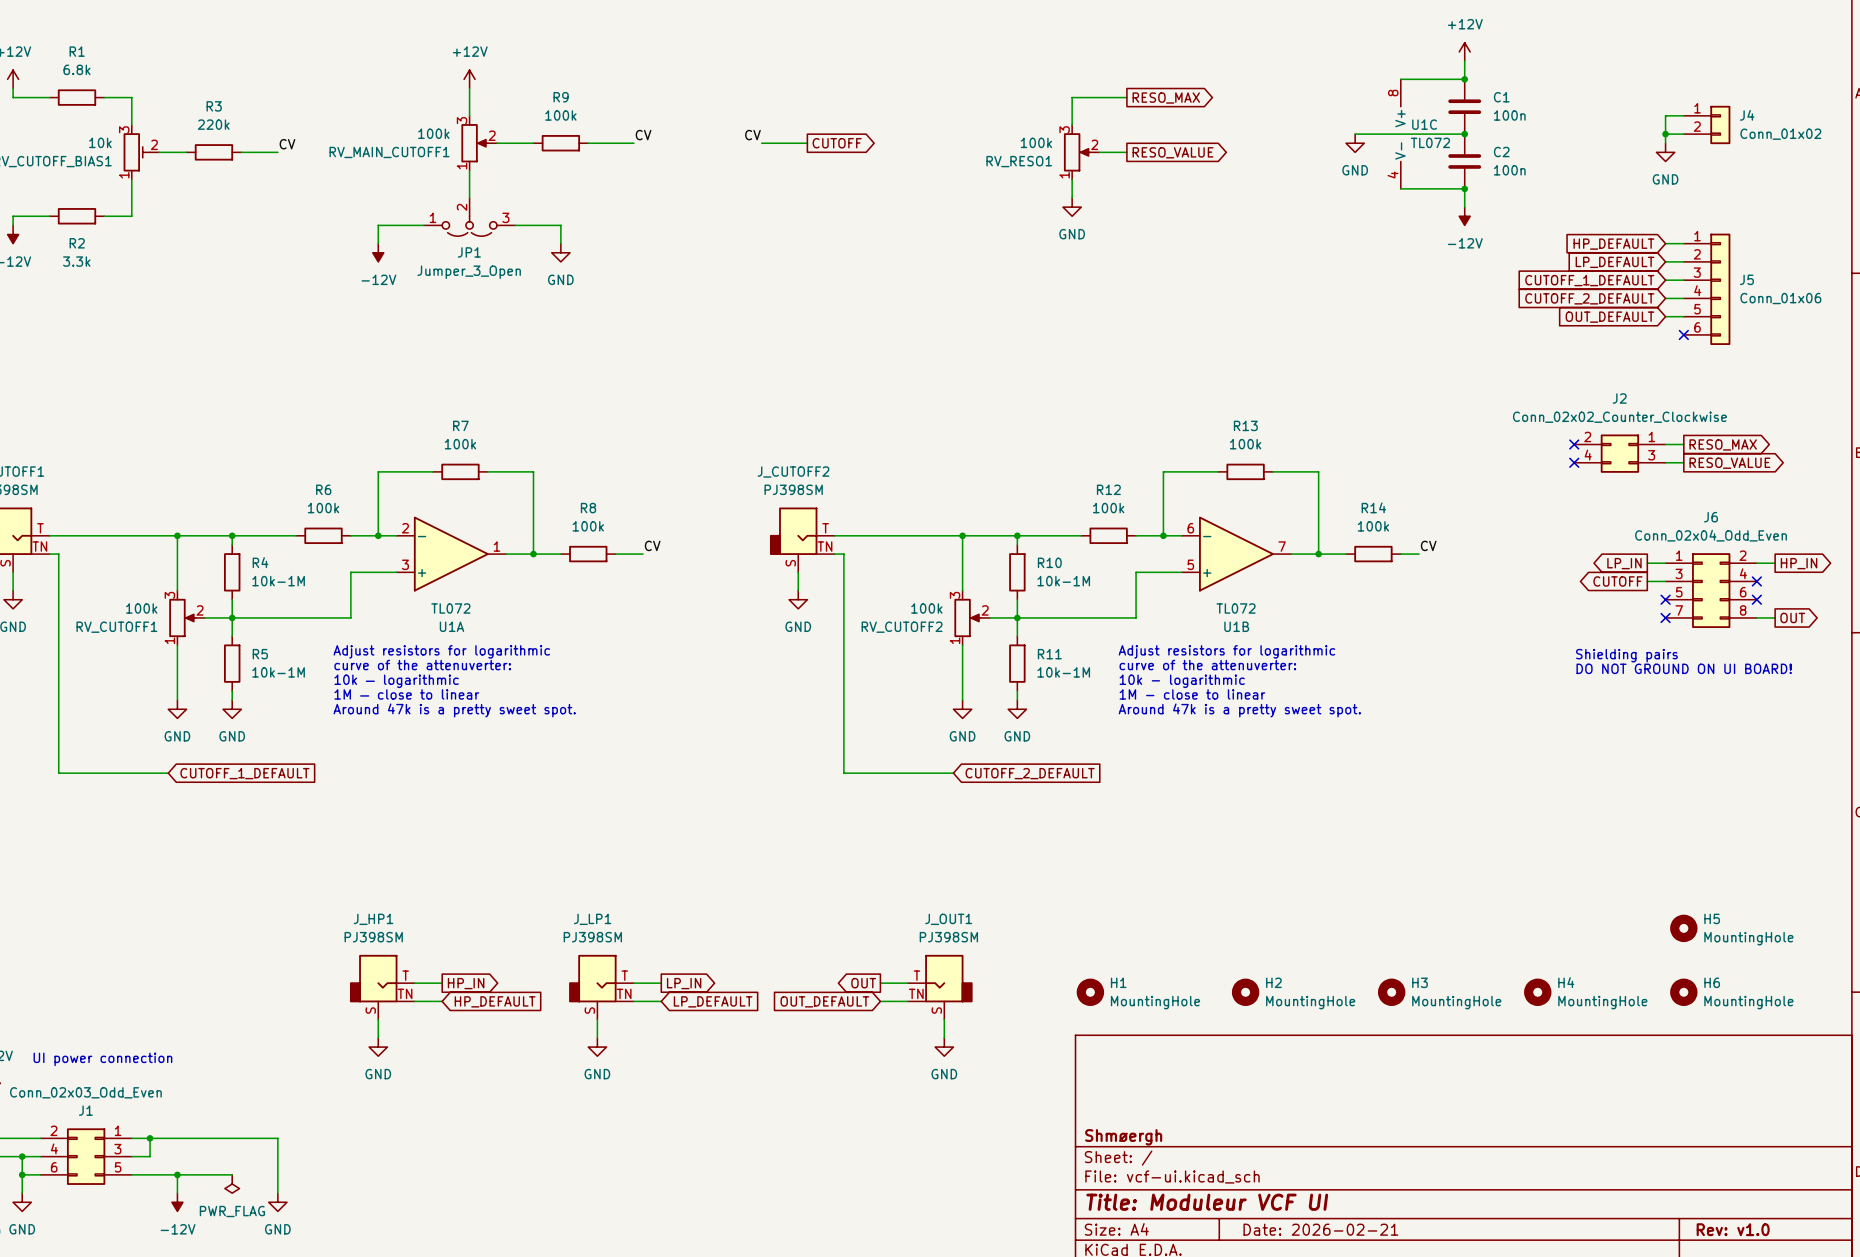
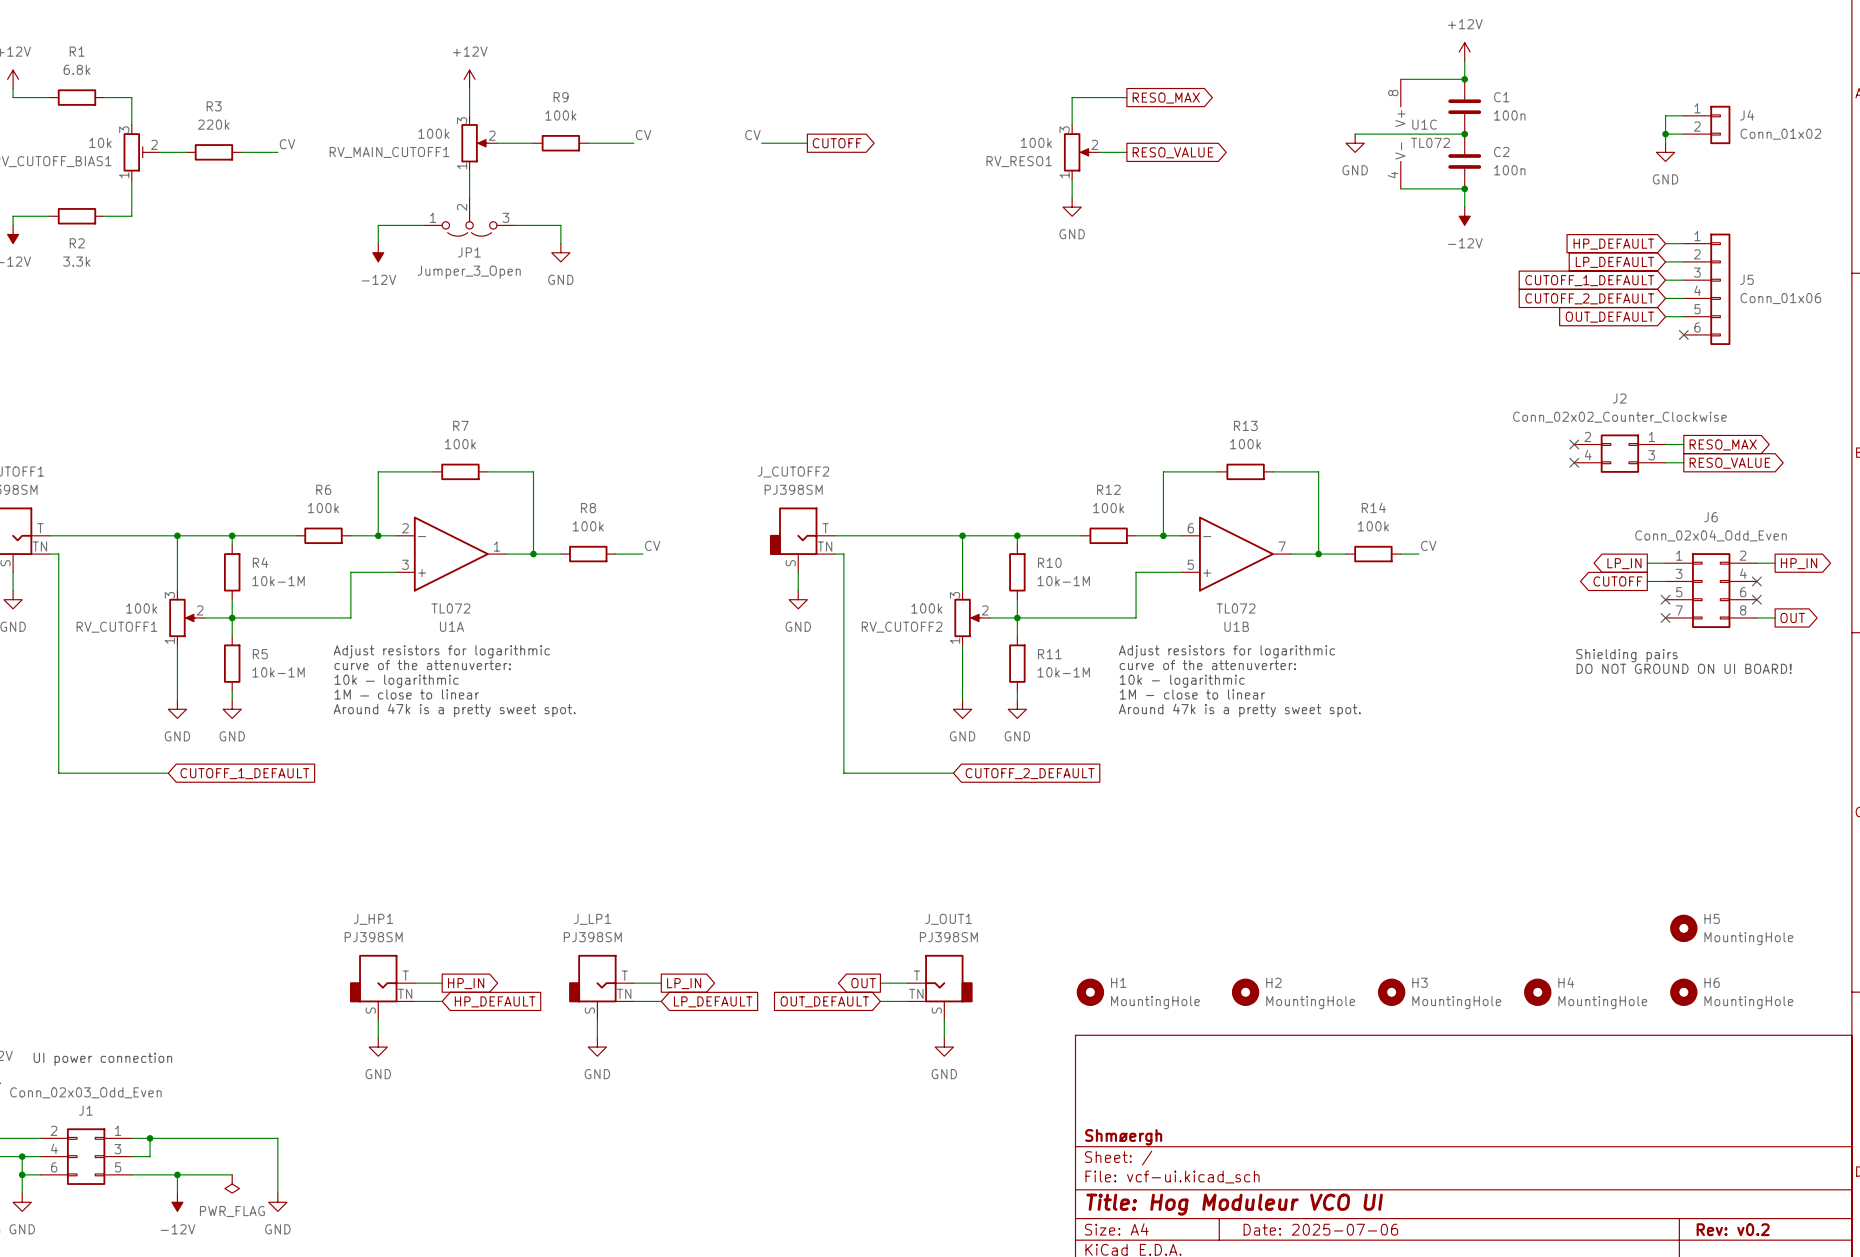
title block: Title: Moduleur VCF UI (1207, 1202) -> Title: Hog Moduleur VCO UI (1234, 1204)
title block: Date: 2026-02-21 (1320, 1229) -> Date: 2025-07-06 (1320, 1229)
title block: Rev: v1.0 (1733, 1229) -> Rev: v0.2 (1733, 1229)

